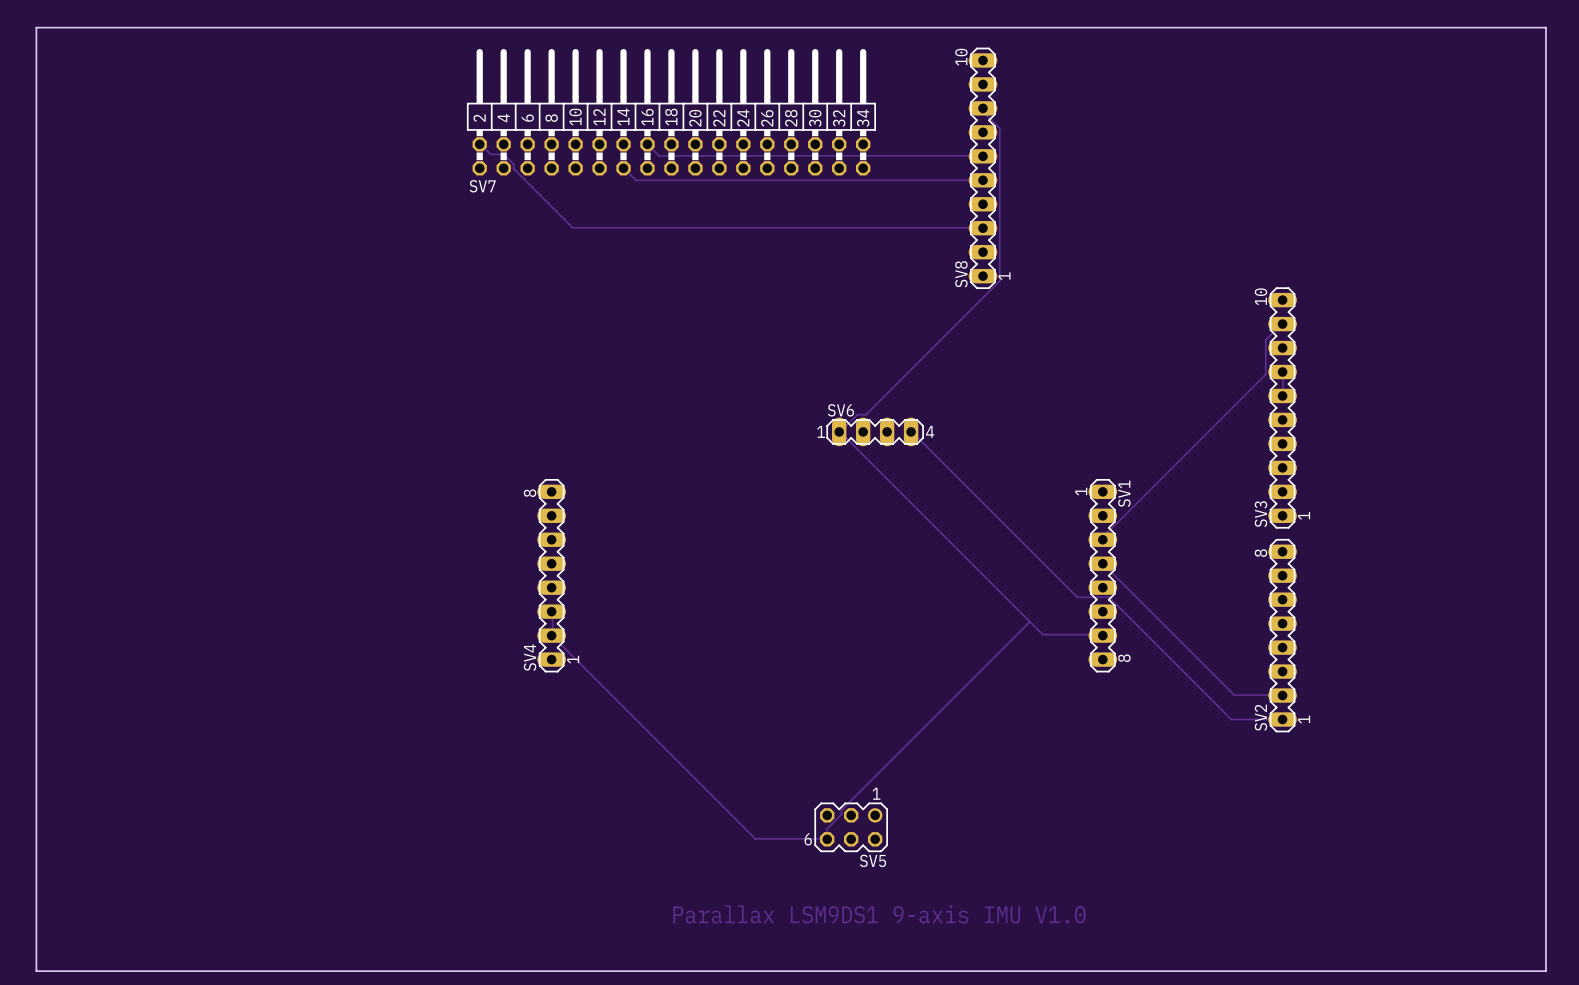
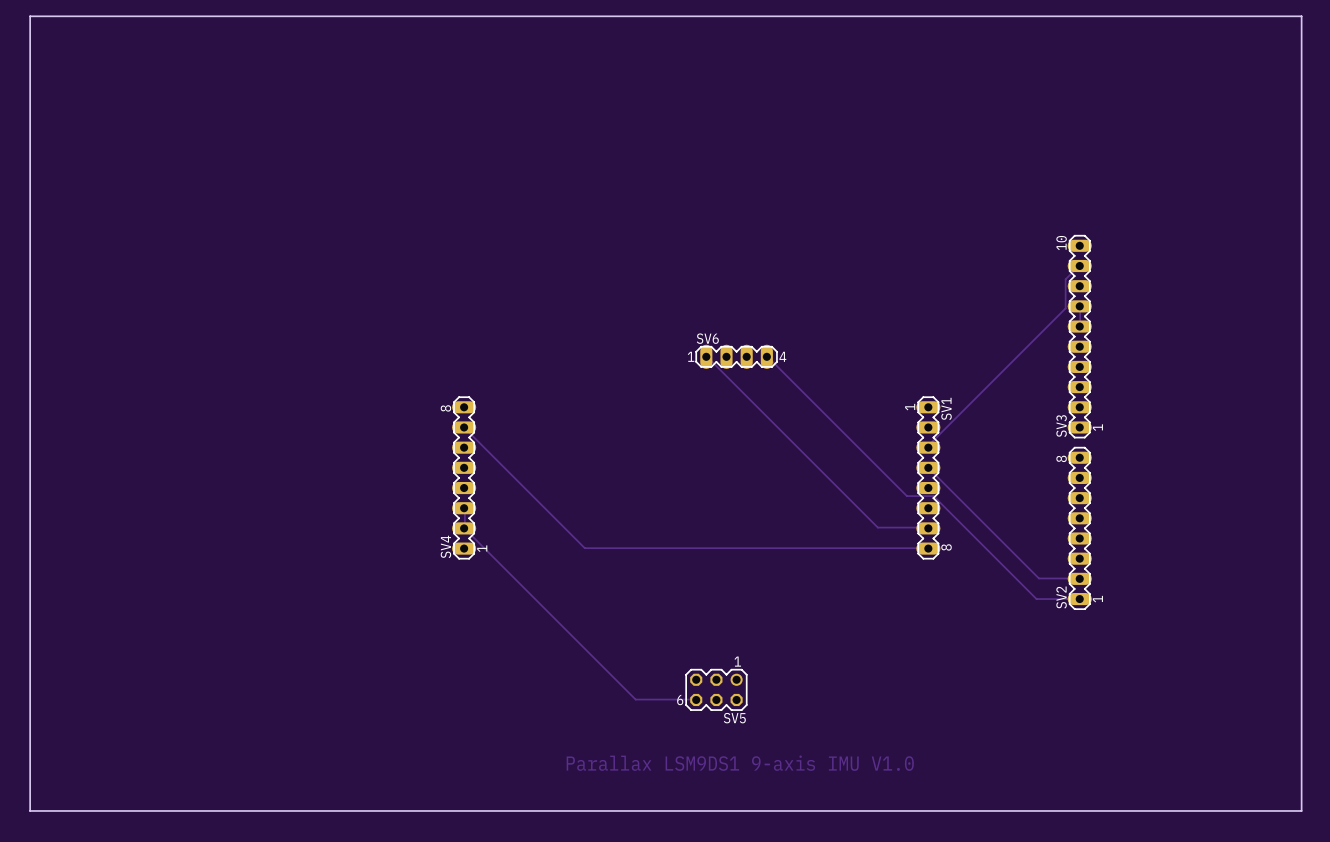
track: (982, 108) (983, 112) (999, 128) (999, 280) (866, 414) (857, 414) (840, 431) -> none
SV7: (671, 112) -> none
track: (479, 144) (490, 154) (503, 154) (513, 164) (513, 168) (572, 227) (982, 228) -> none
track: (647, 144) (658, 155) (982, 156) -> none
track: (623, 168) (635, 180) (982, 180) -> none
SV8: (982, 168) -> none
track: none -> (464, 427) (584, 548) (928, 548)
track: (1029, 621) (841, 810) (841, 814) (827, 828) (827, 838) -> none

